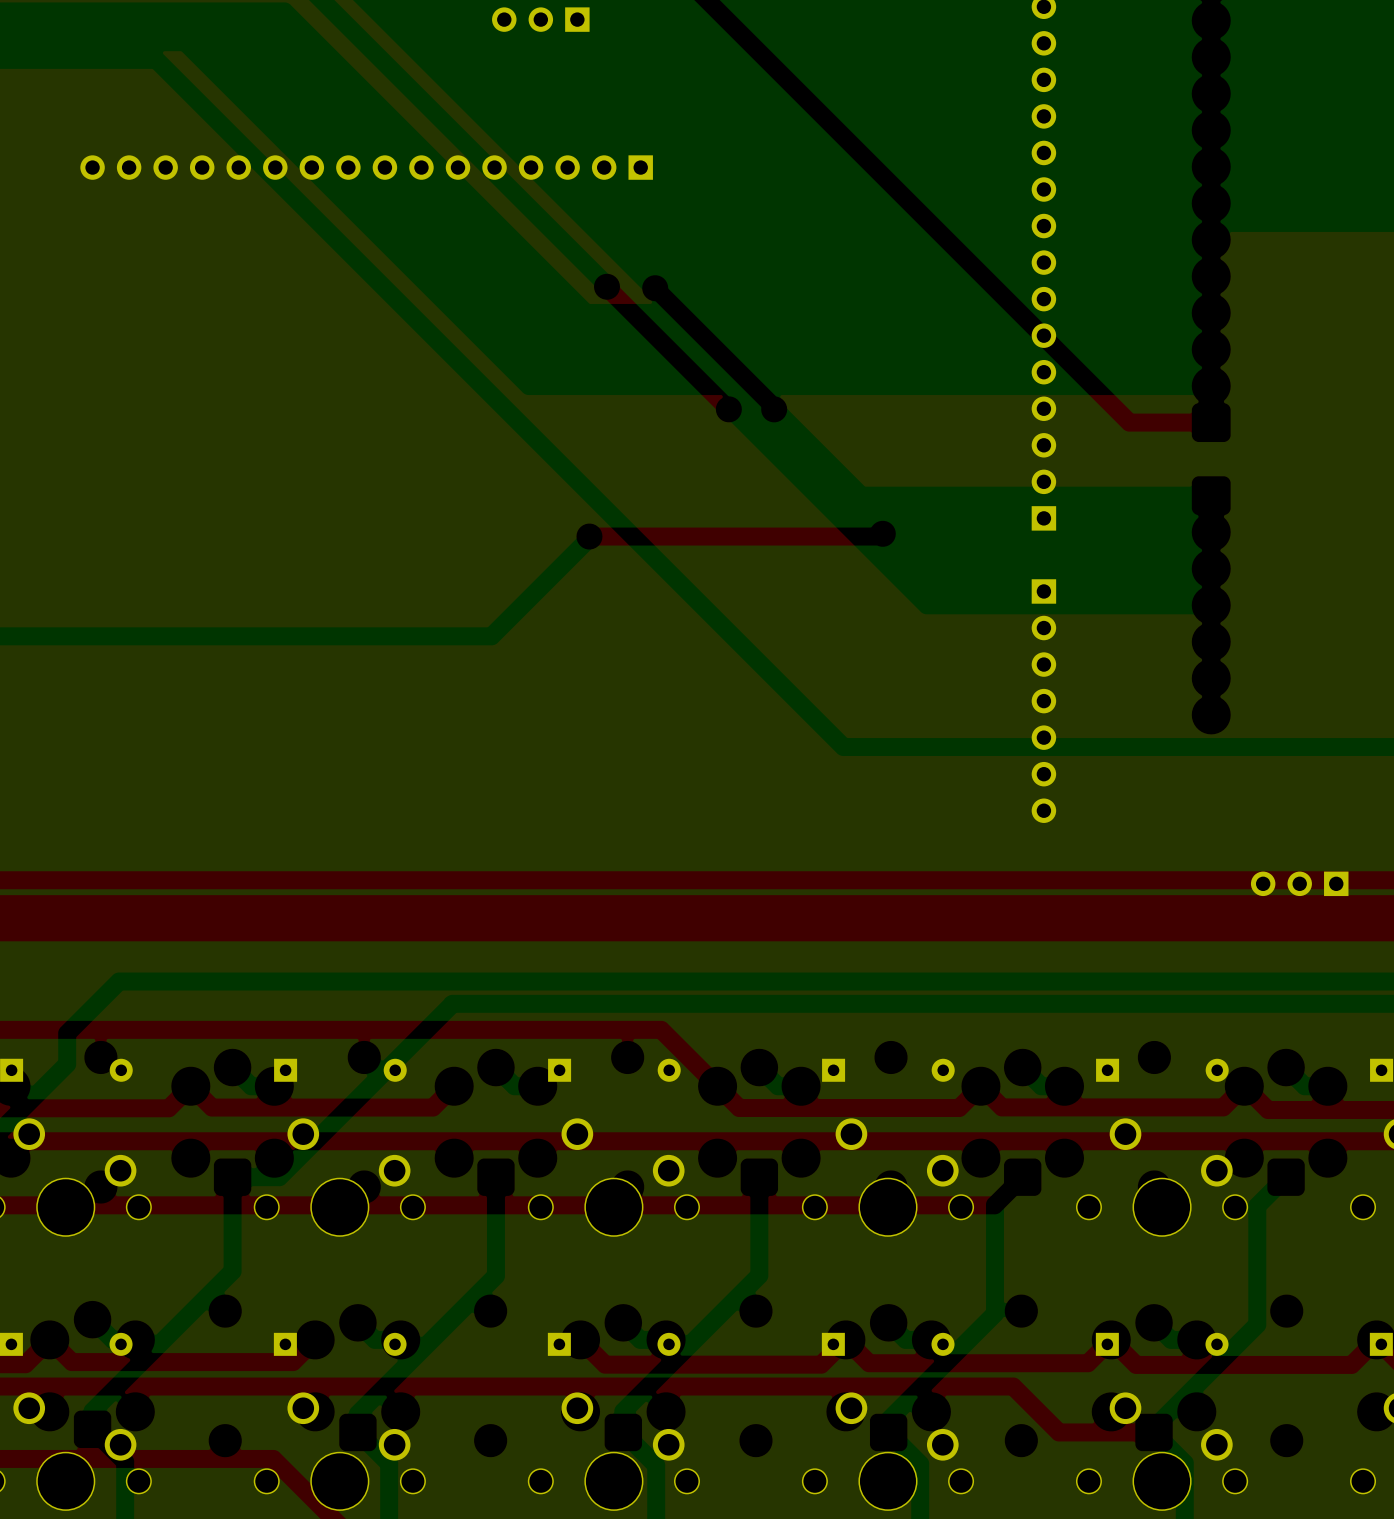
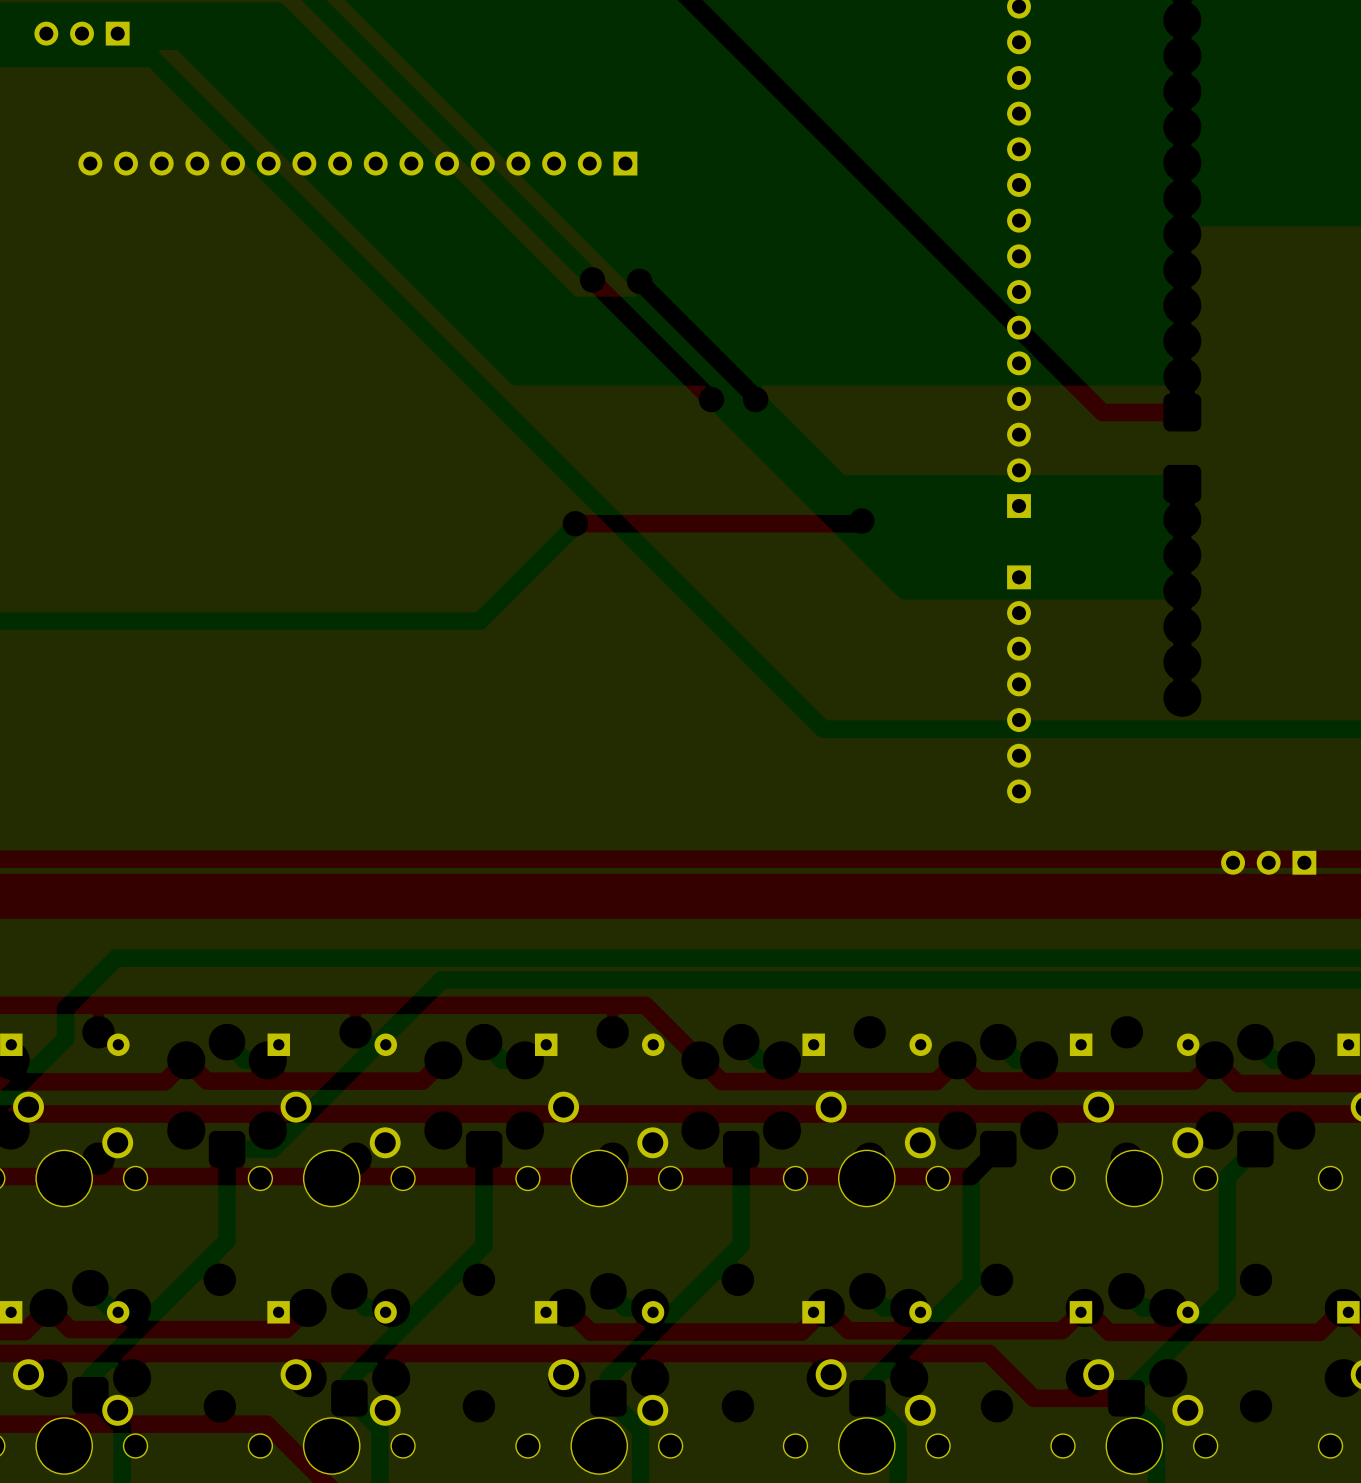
part: (540, 19) -> none
part: none -> (82, 33)

